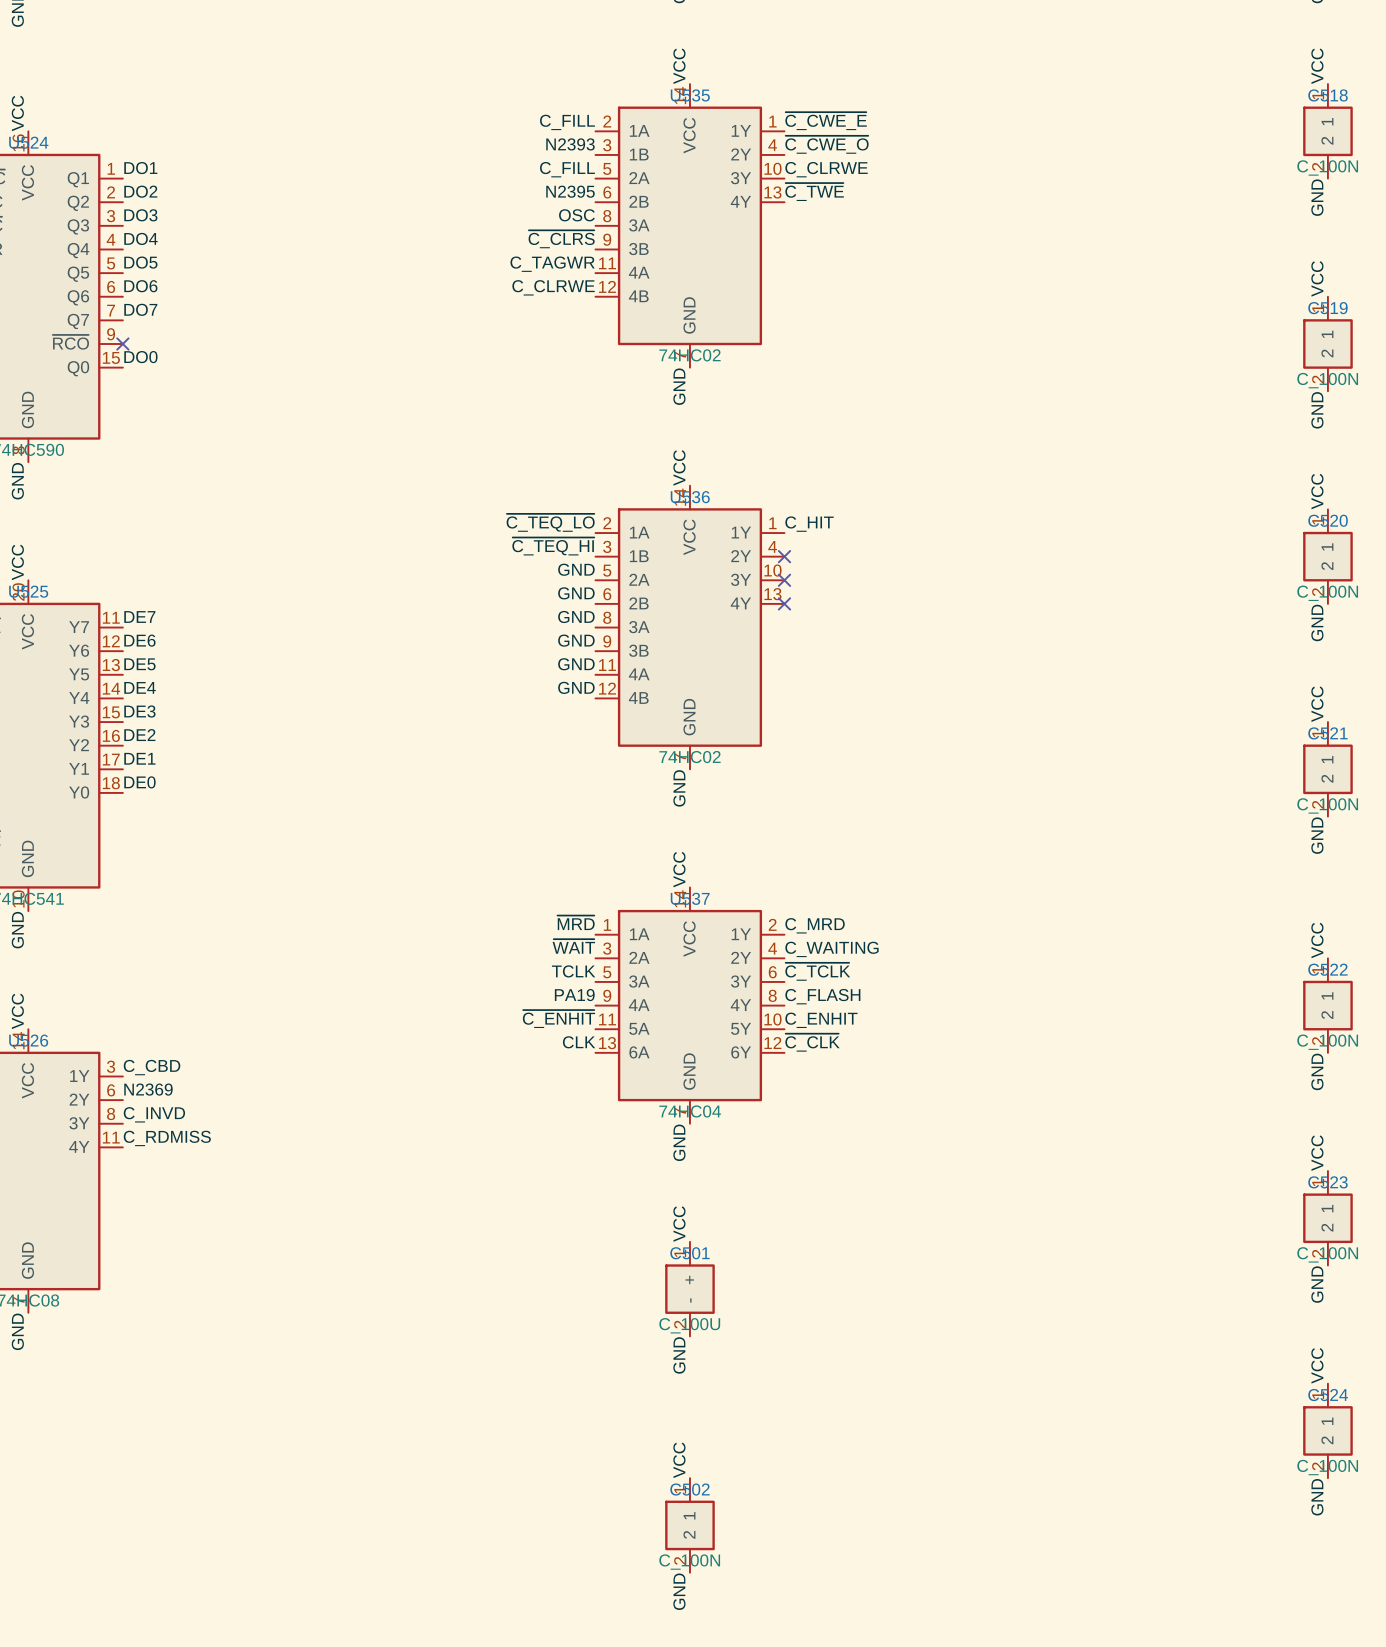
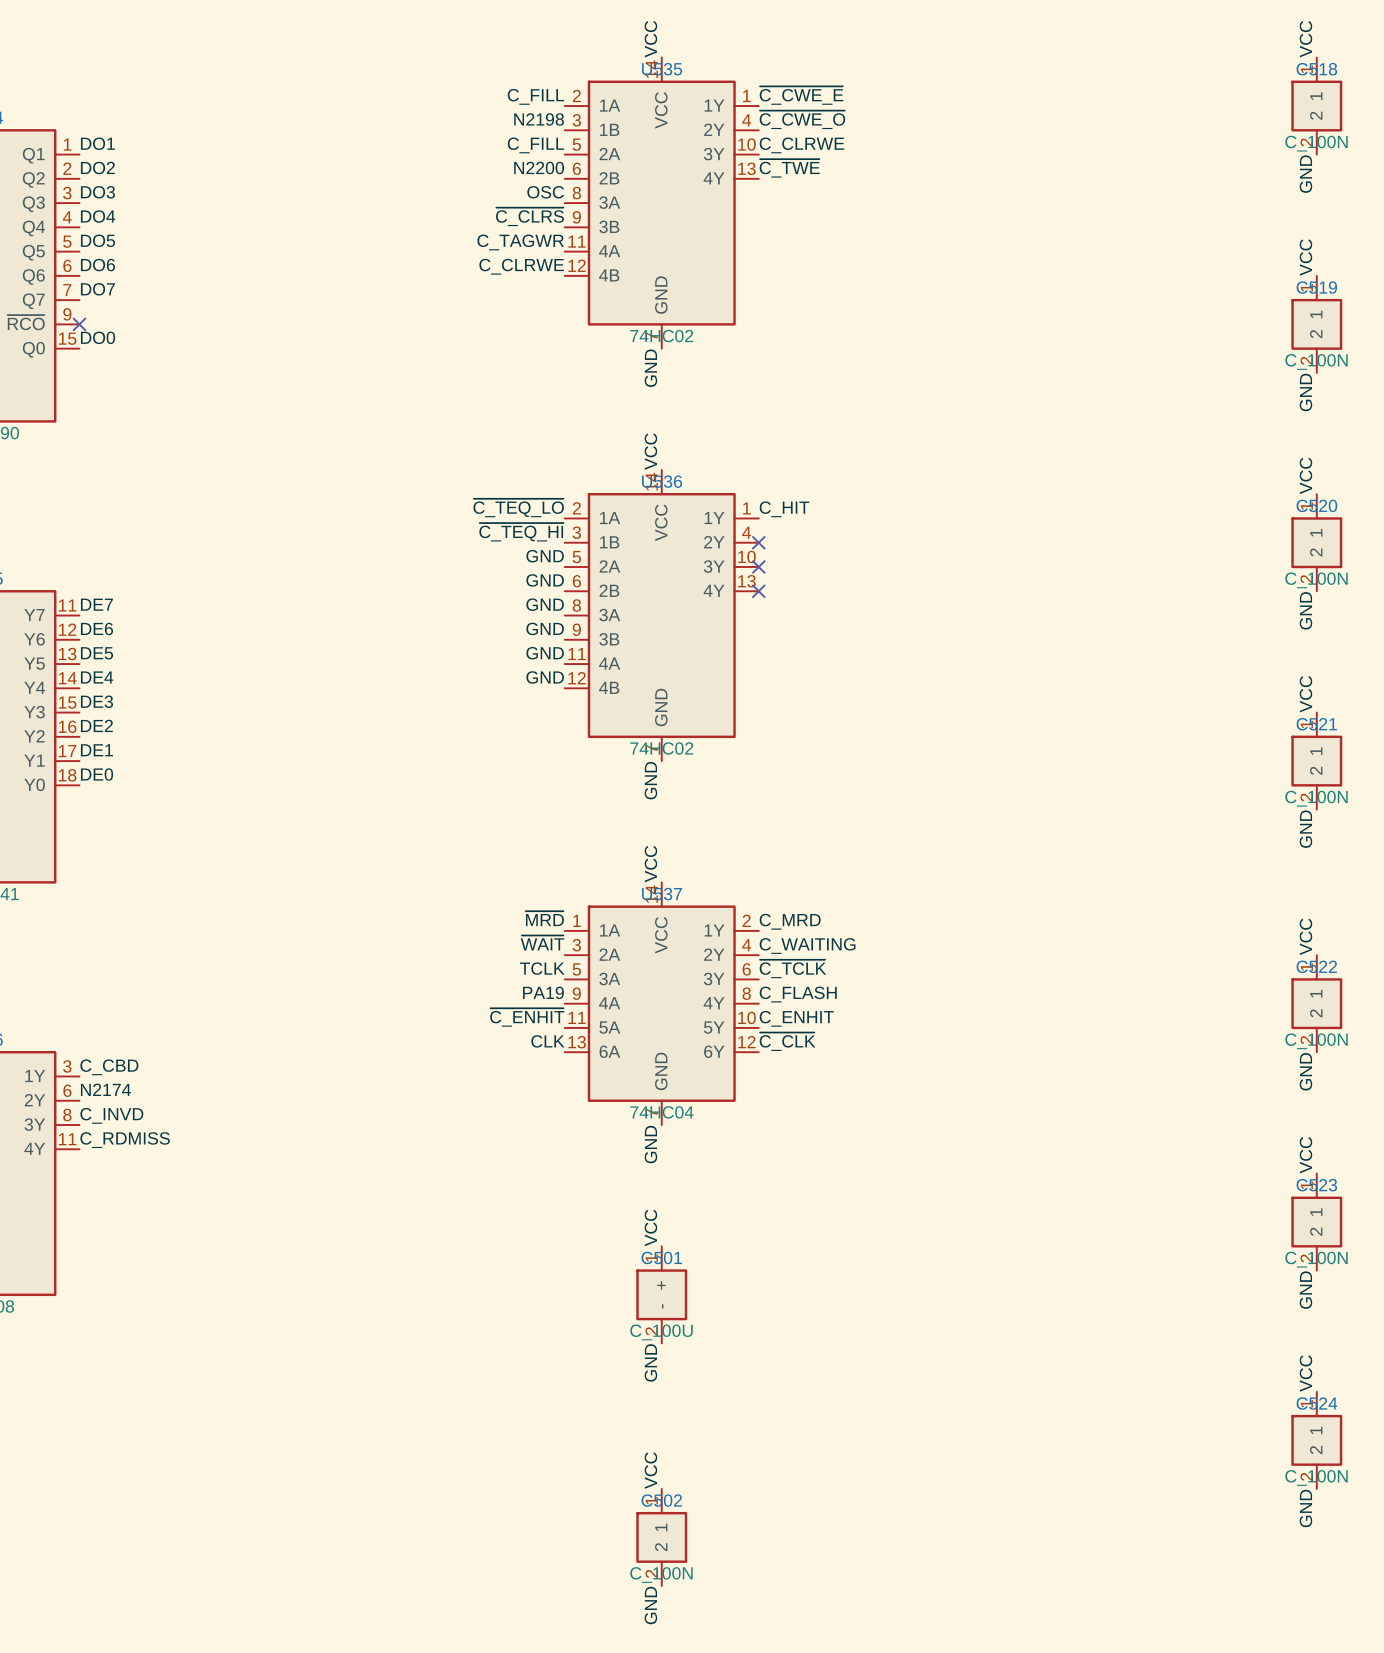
label: N2393 (570, 144) -> N2198 (539, 119)
label: N2395 (570, 191) -> N2200 (539, 168)
label: N2369 (148, 1089) -> N2174 (105, 1089)

